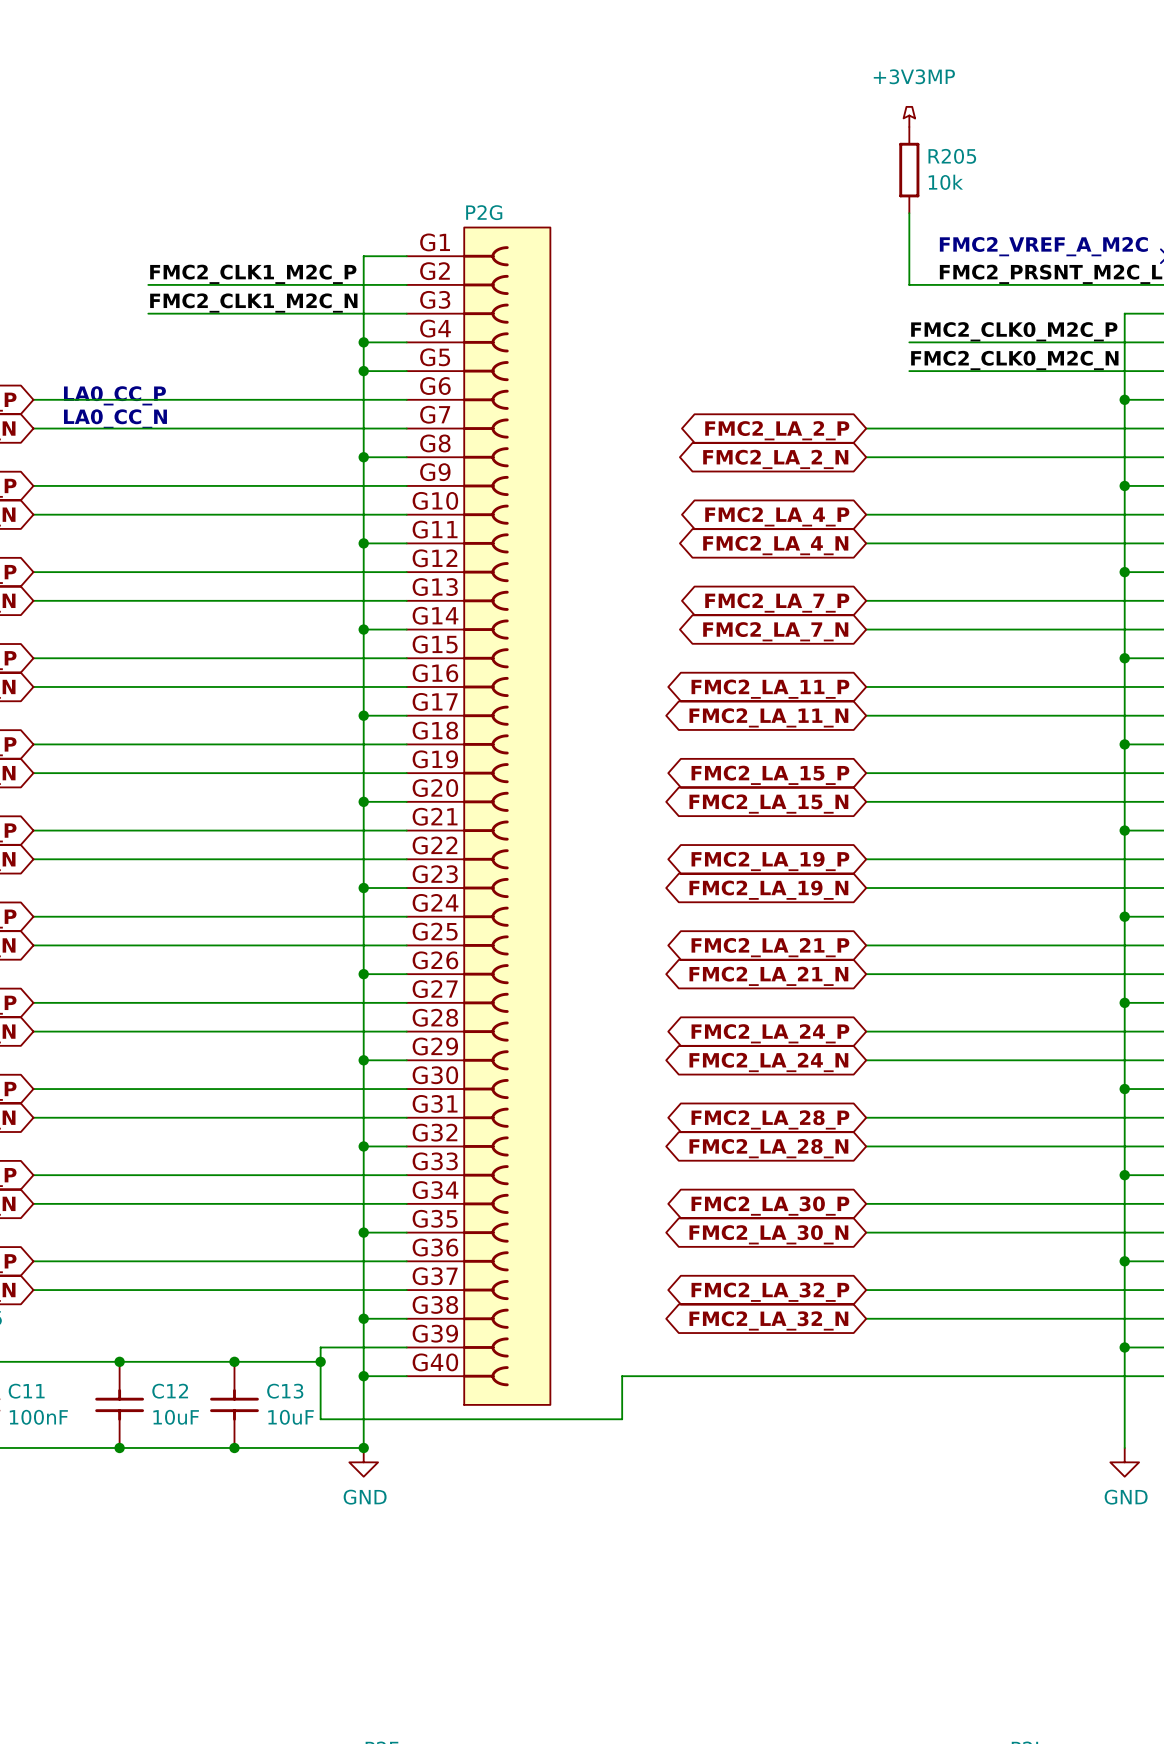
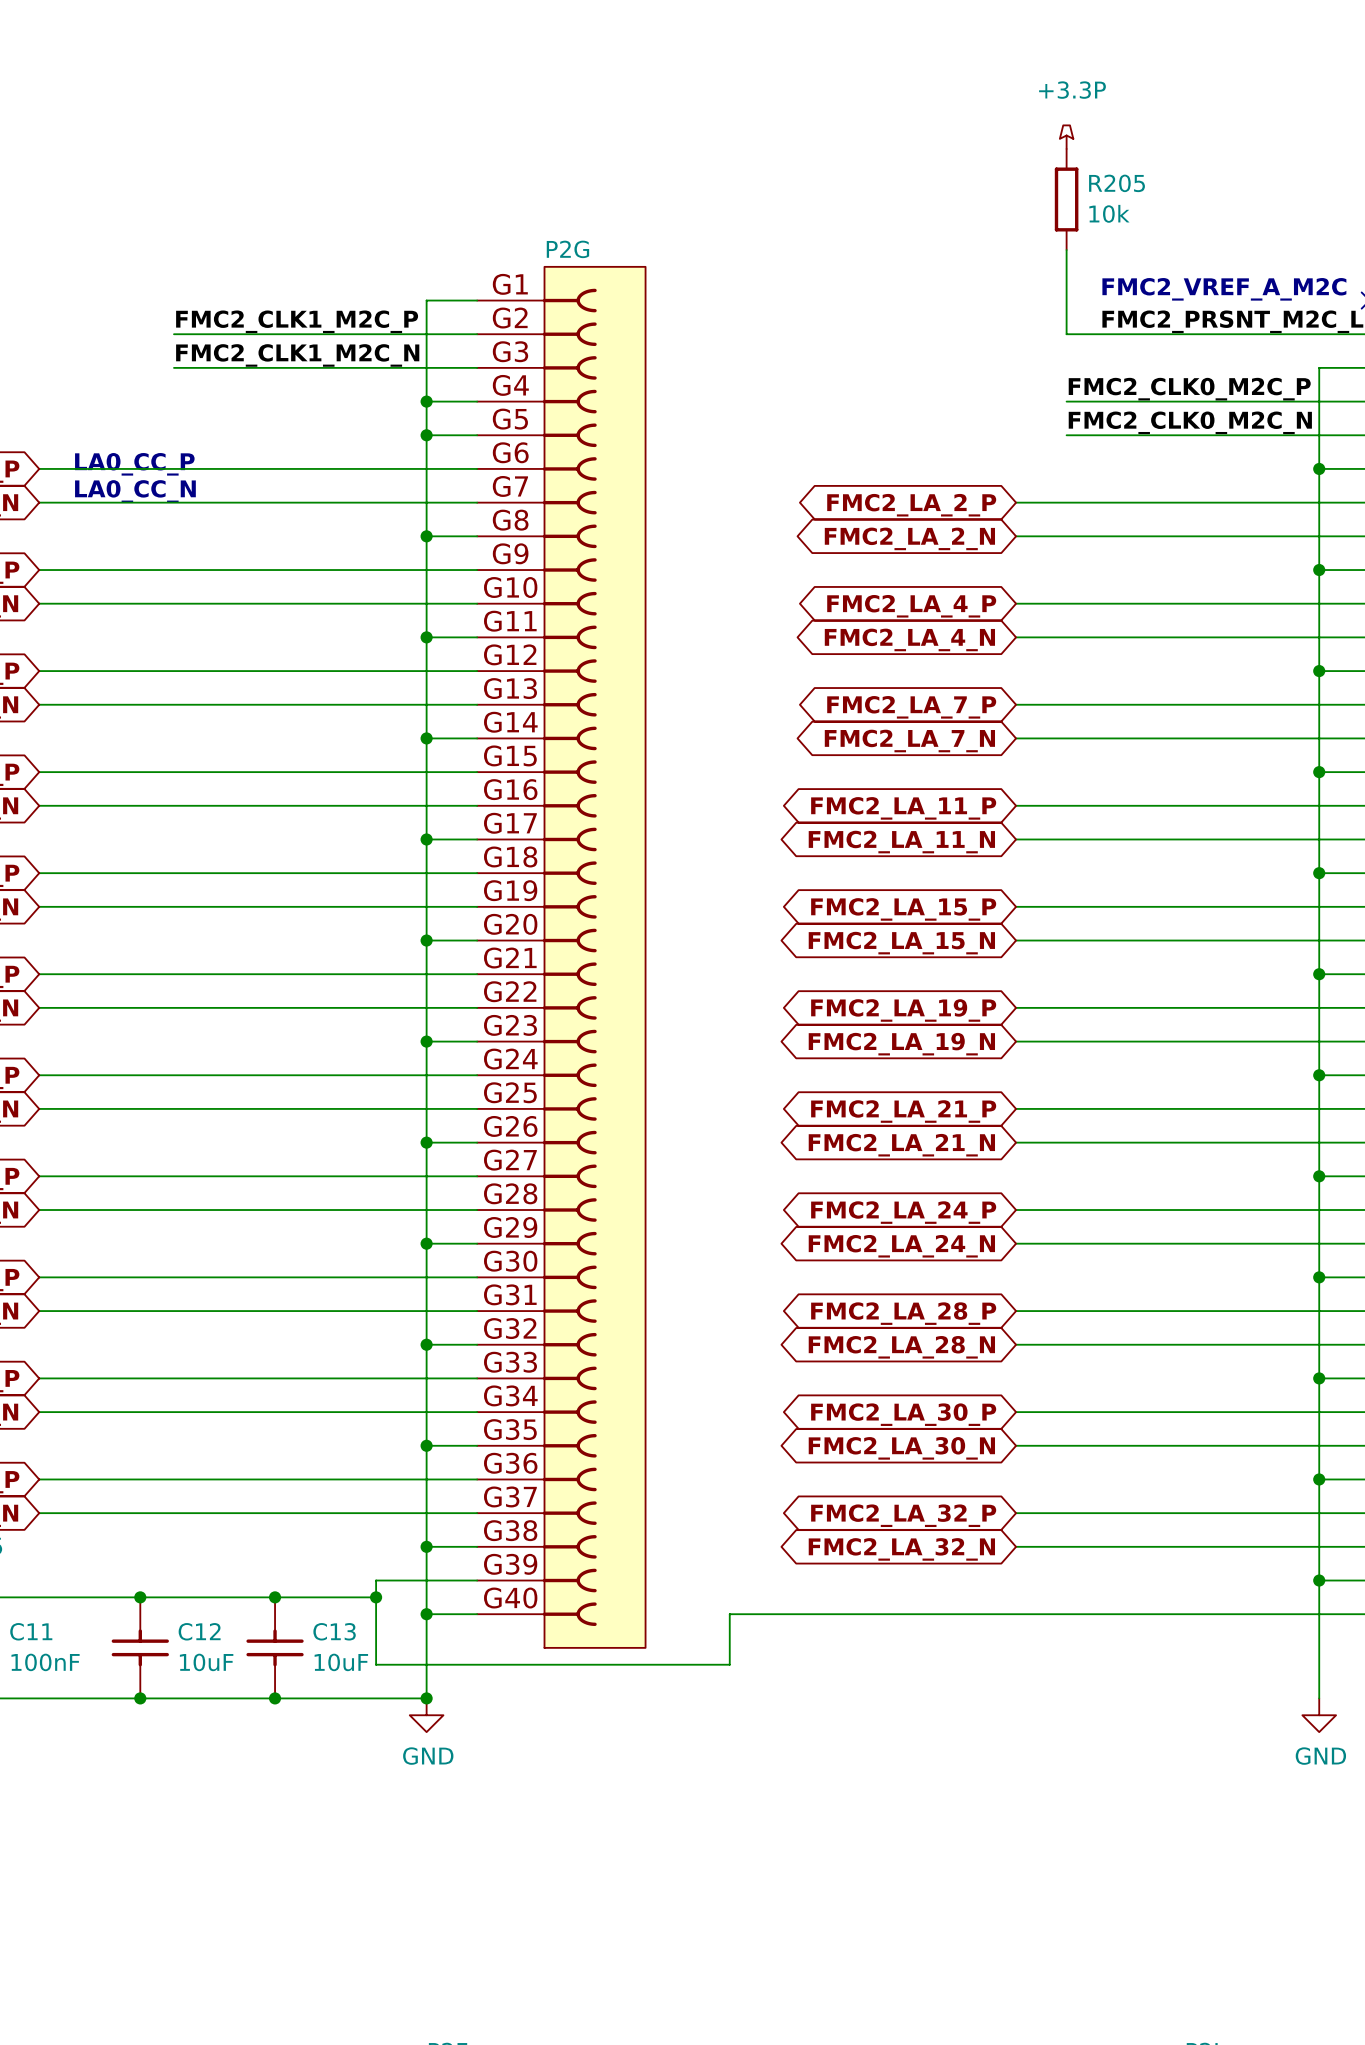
power symbol: +3V3MP (909, 116) -> +3.3P (1066, 137)

